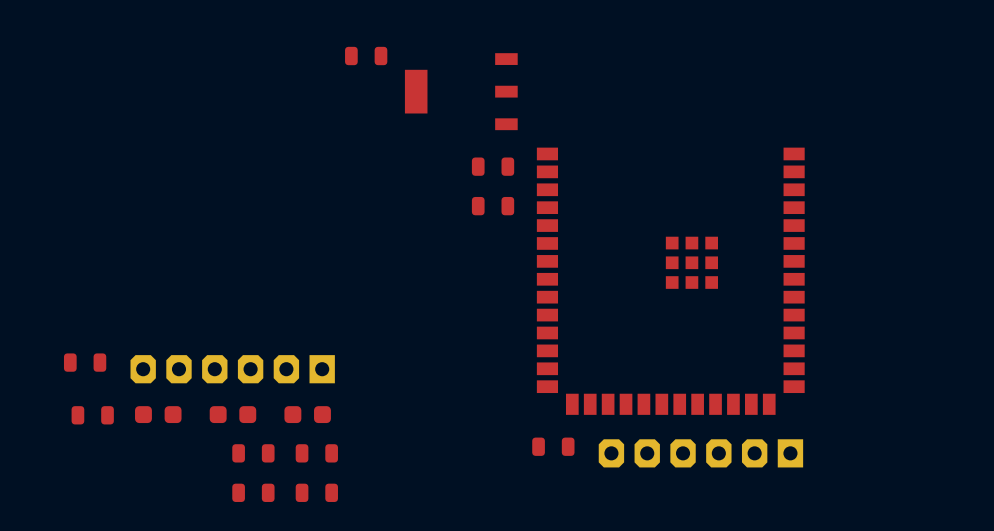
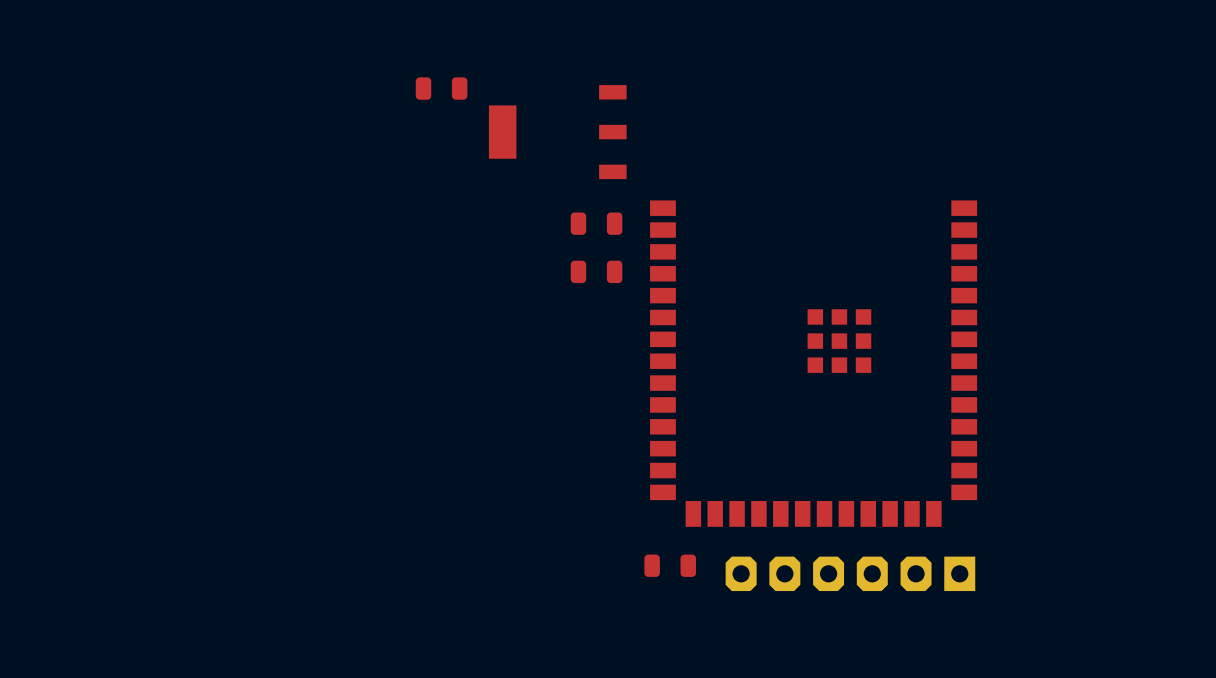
part: (85, 362) -> none
part: (232, 369) -> none
part: (158, 414) -> none
part: (232, 414) -> none
part: (307, 414) -> none
part: (92, 415) -> none
part: (253, 453) -> none
part: (316, 453) -> none
part: (253, 492) -> none
part: (316, 492) -> none

